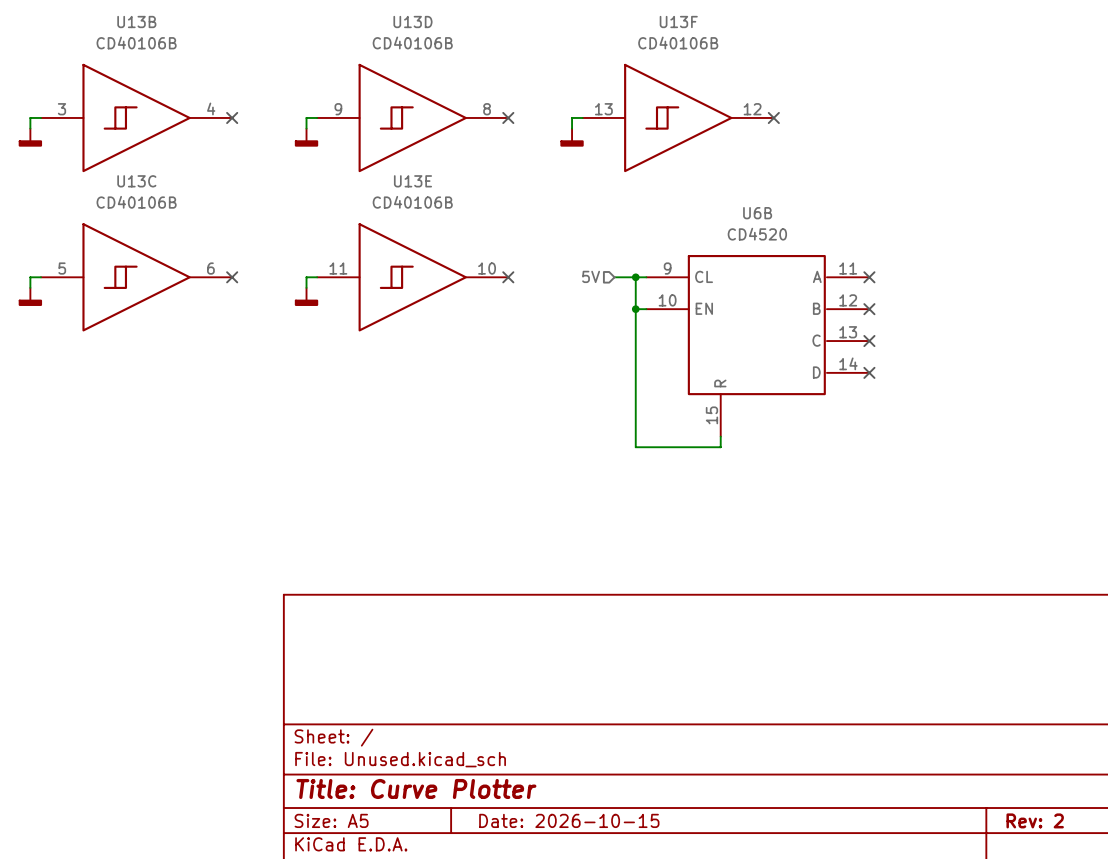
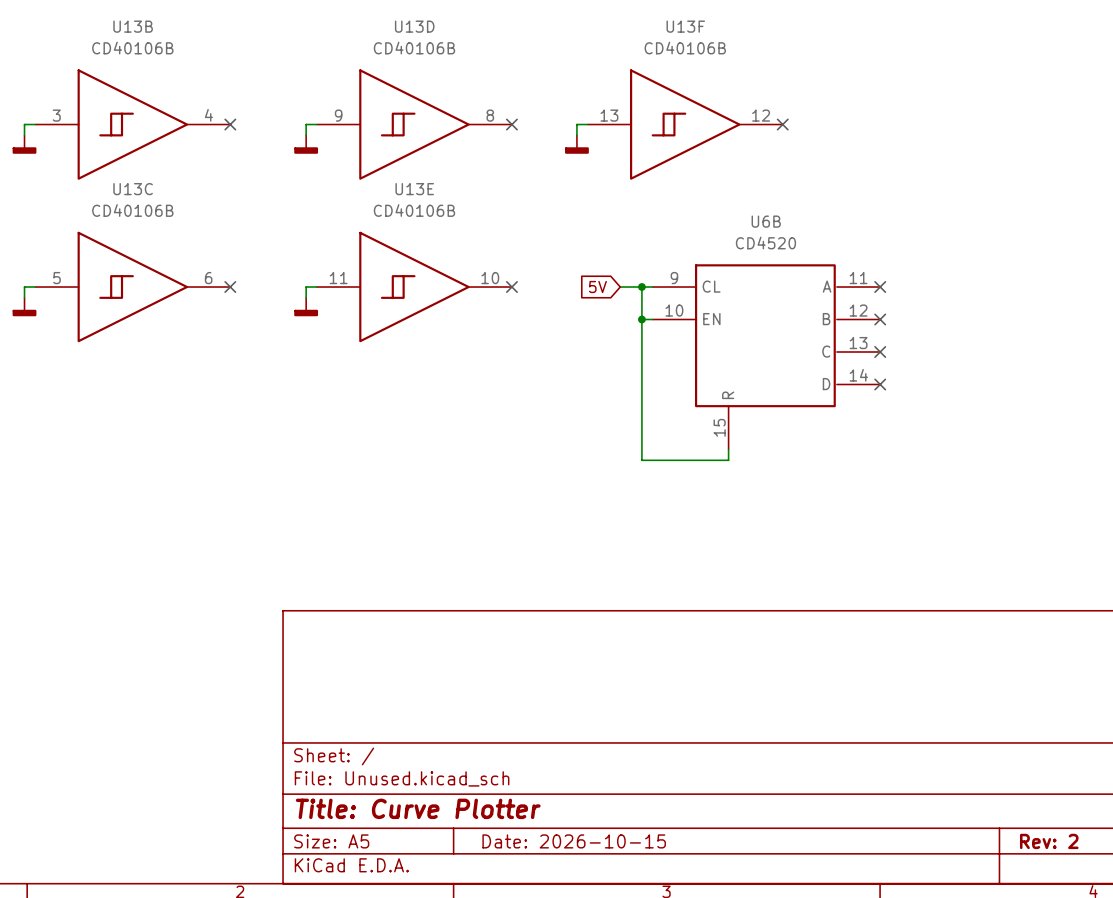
hierarchical label: 5V (591, 276) -> none
global label: none -> 5V (597, 287)

